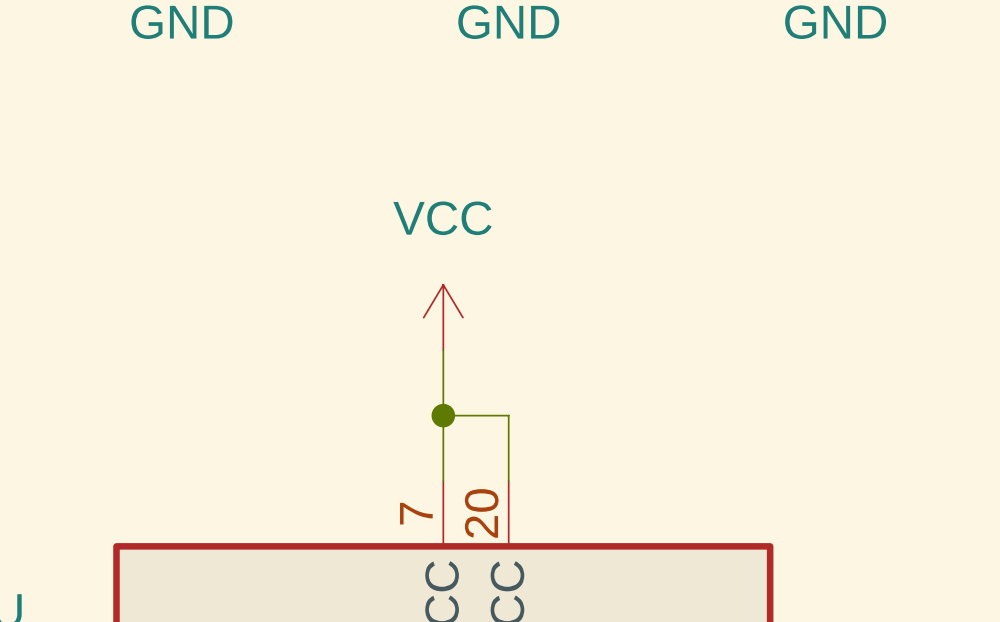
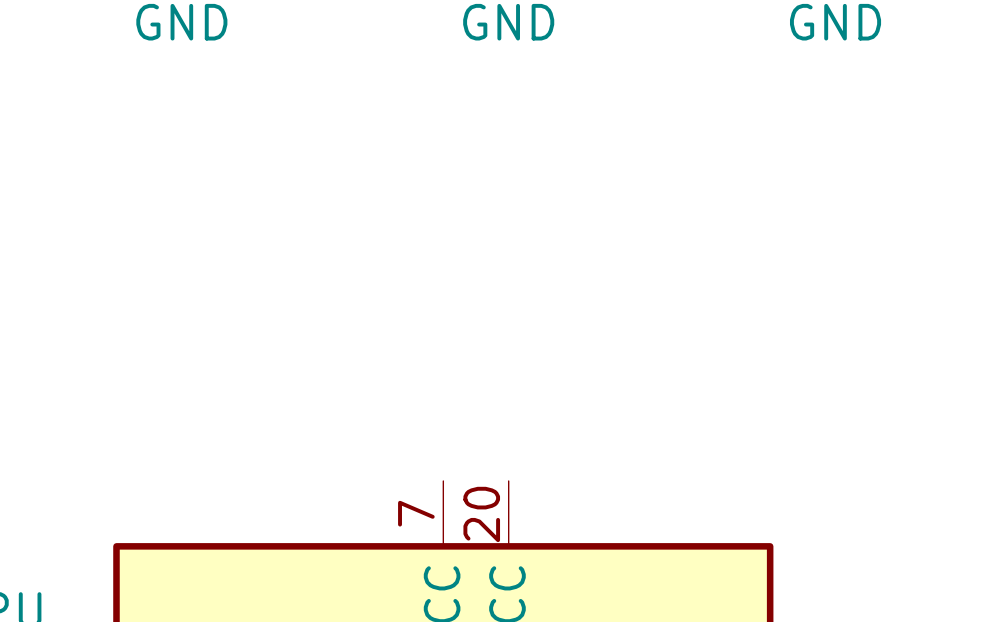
power symbol: VCC (443, 317) -> none
wire: (443, 350) (443, 480) -> none
wire: (443, 415) (508, 415) (508, 480) -> none
junction: (443, 415) -> none

